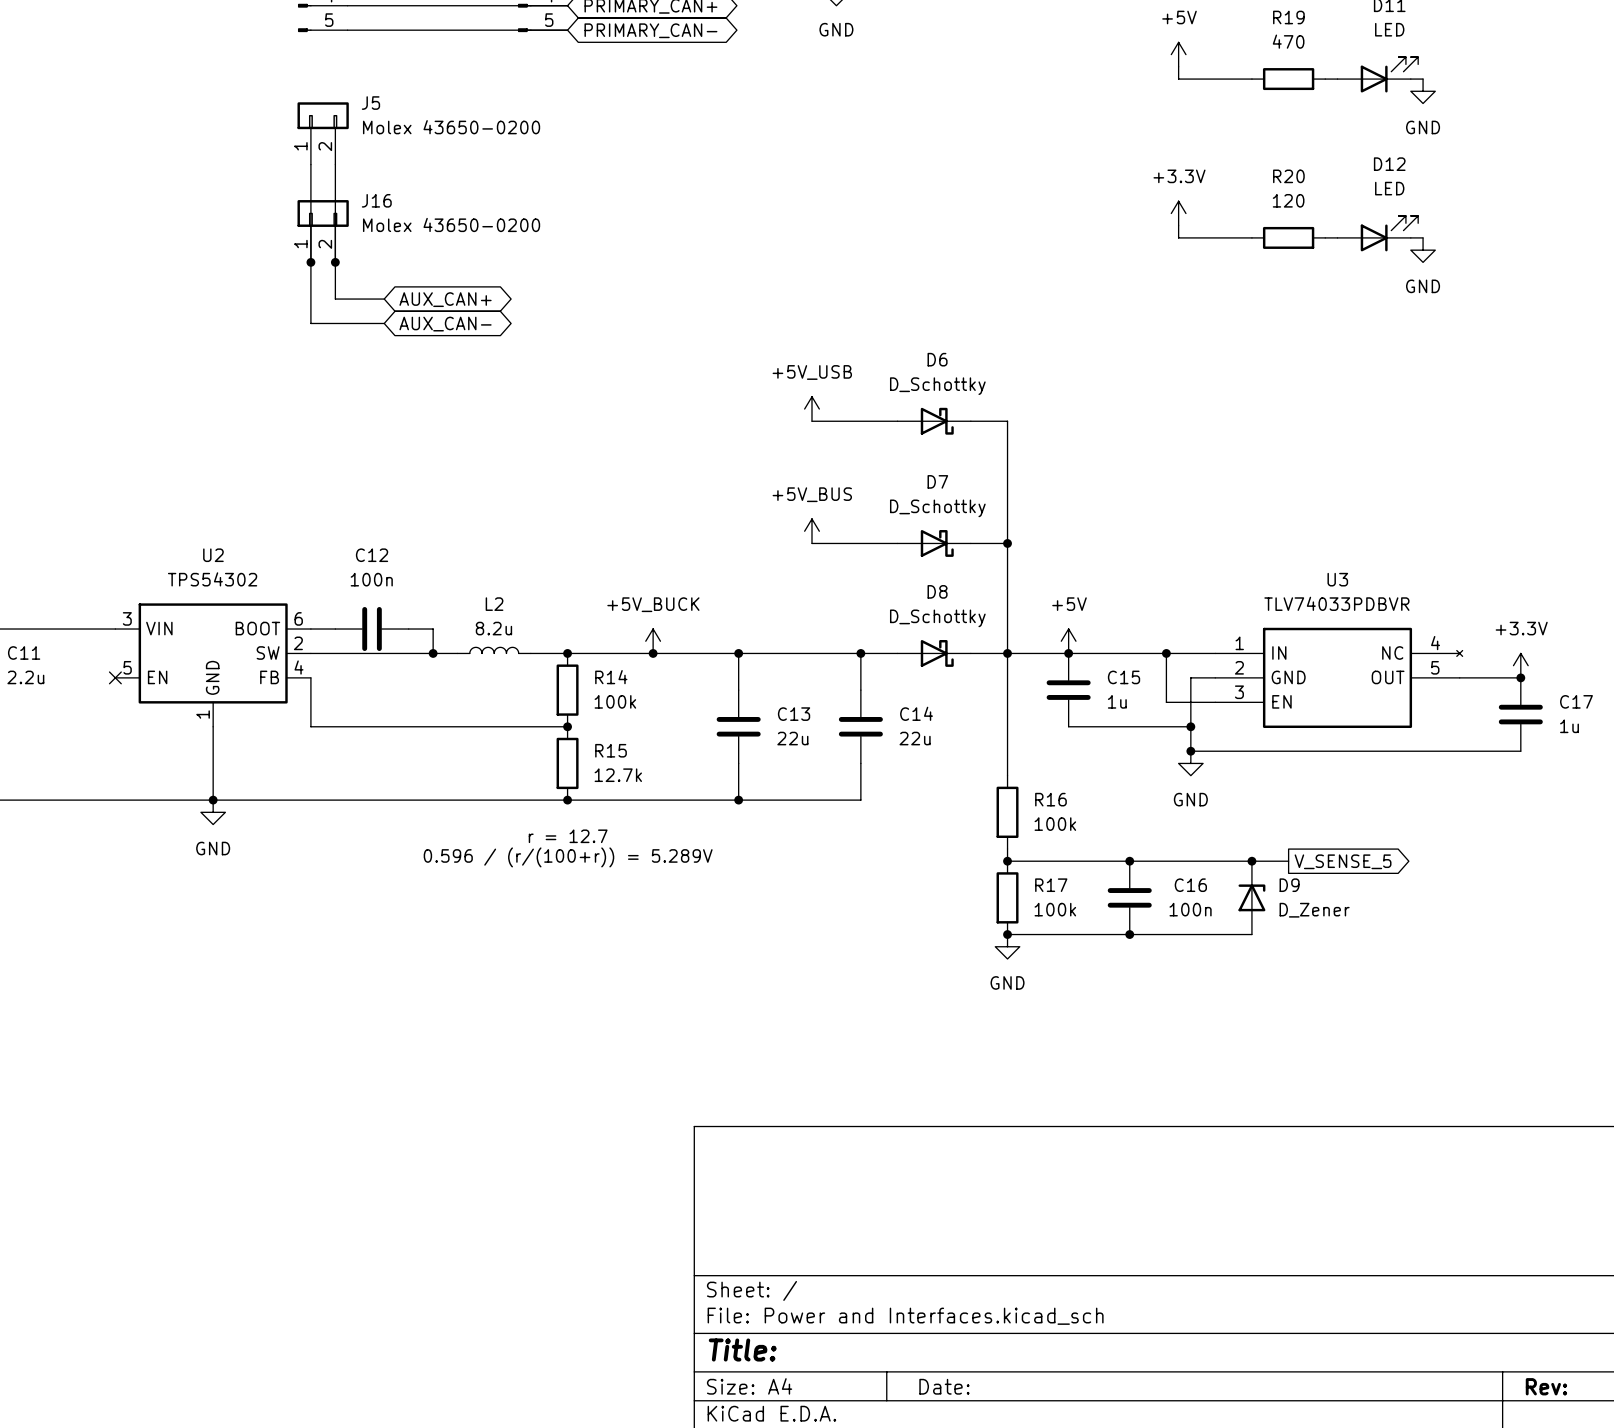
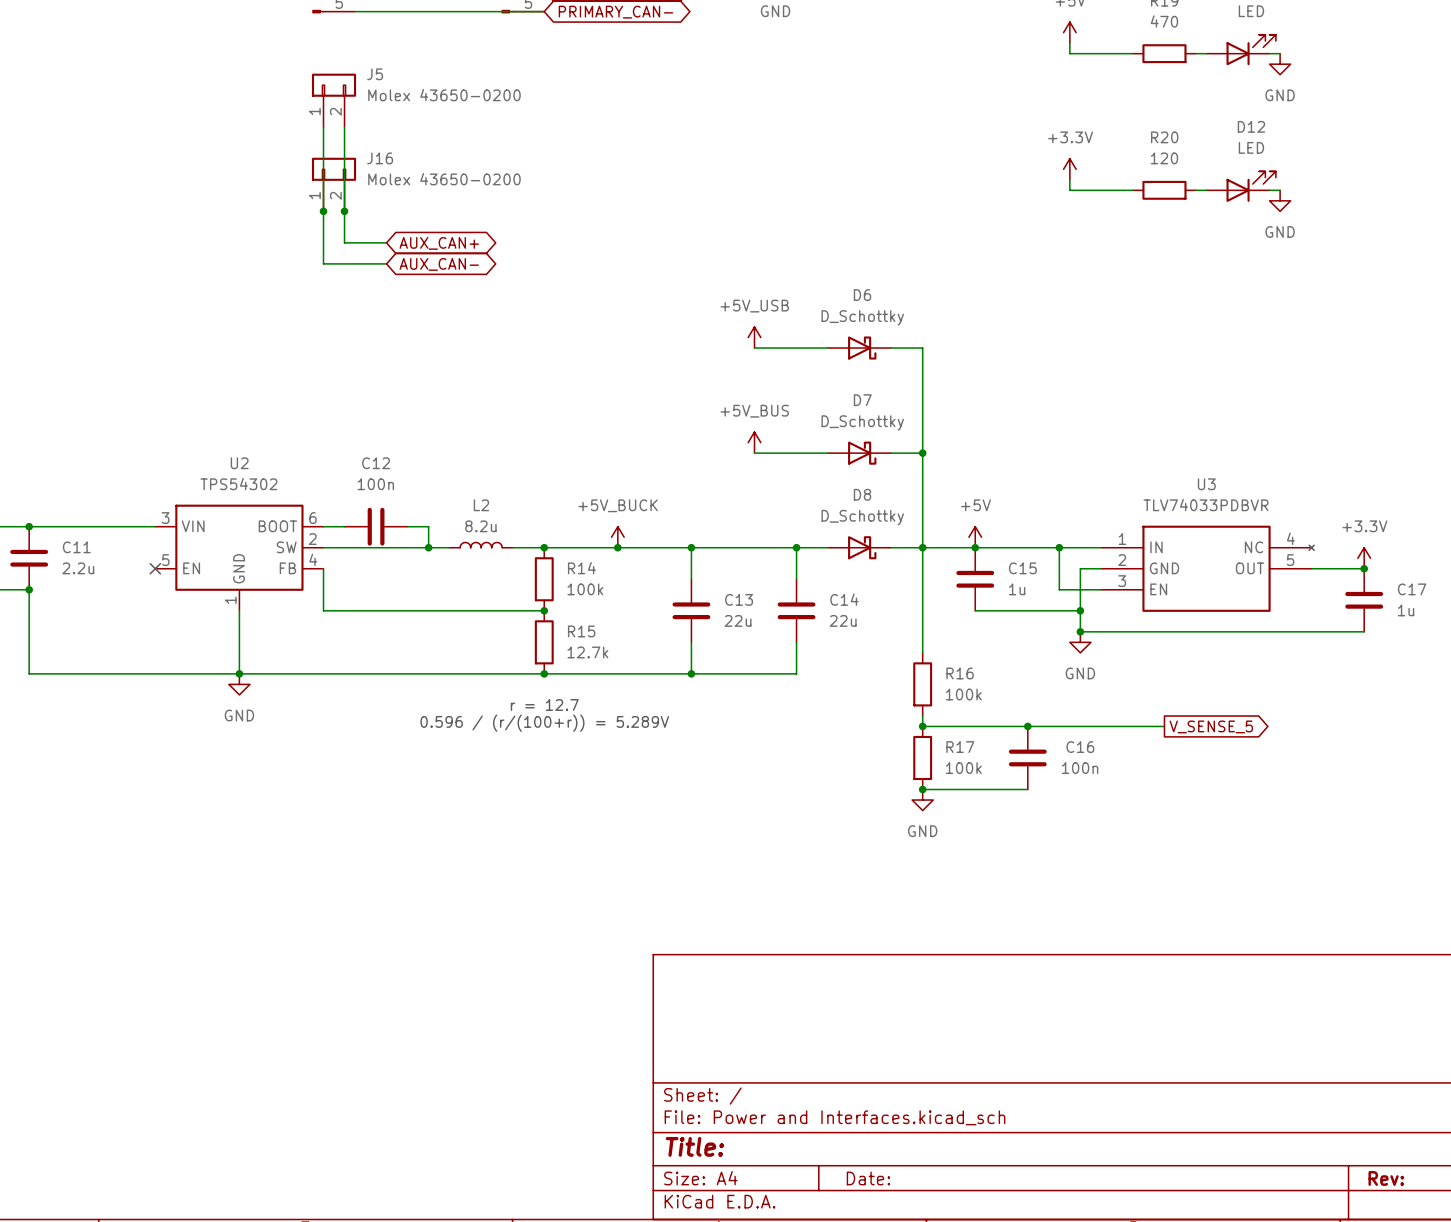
junction: (1251, 861) -> none
D9: D_Zener (1251, 897) -> none
wire: (1129, 934) (1251, 934) -> none
junction: (1129, 934) -> none

